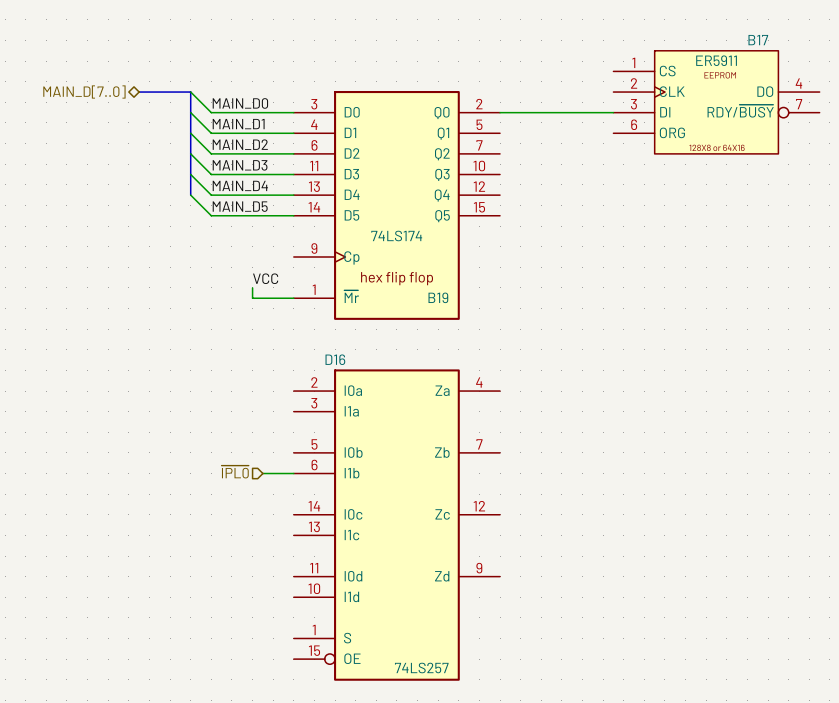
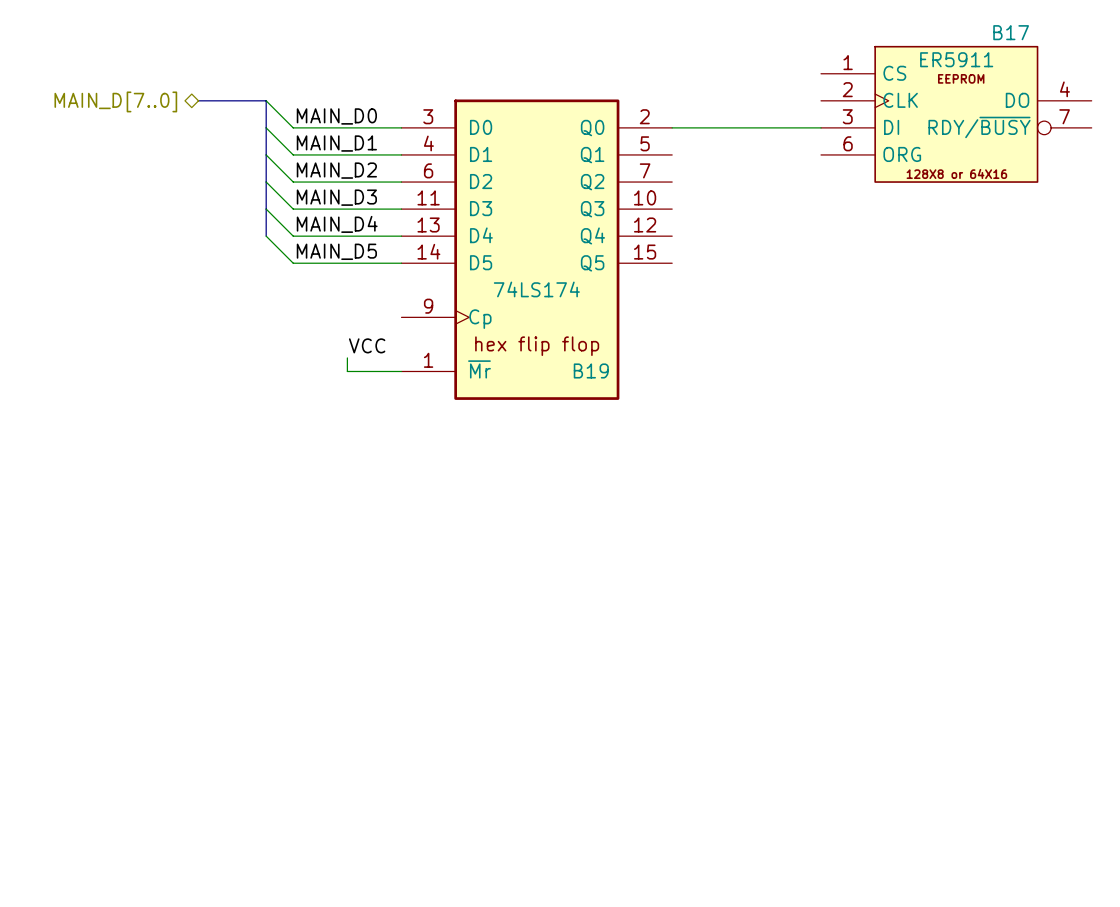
hierarchical label: ~{IPL0} (235, 472) -> none
wire: (262, 473) (293, 473) -> none
D16: 74LS257 (396, 525) -> none

